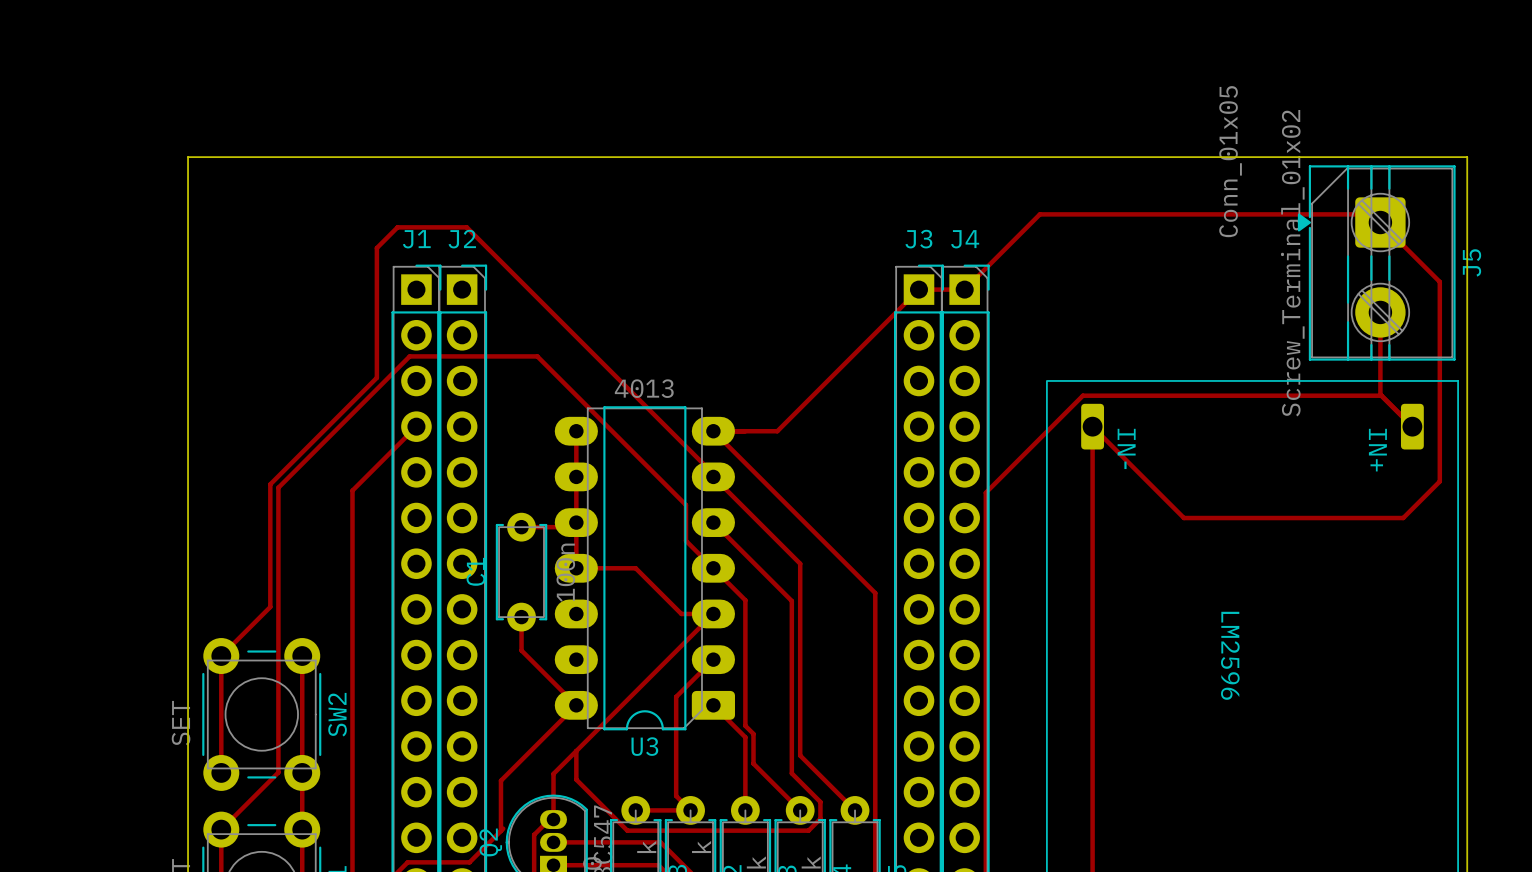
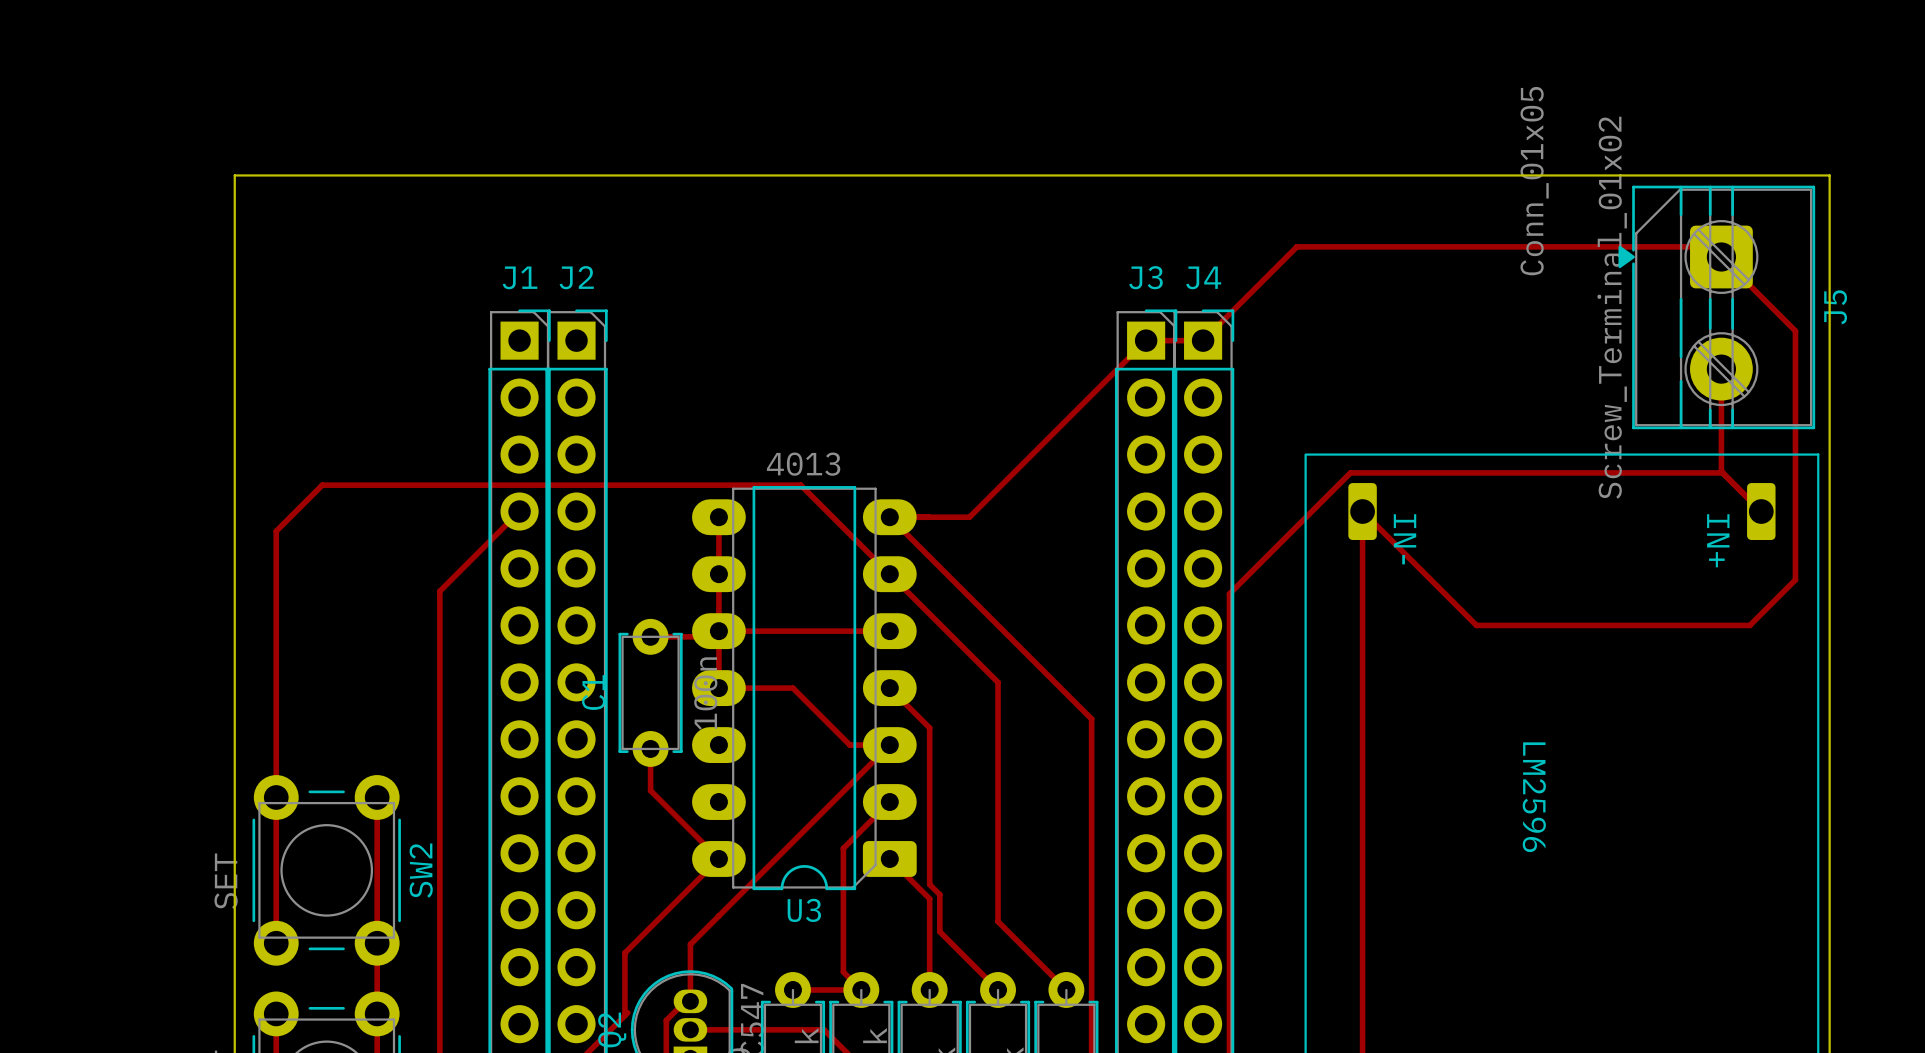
top track: (713, 476) (713, 473) (466, 227) (397, 227) (376, 248) (376, 377) (270, 484) (270, 607) (221, 656) -> (889, 574) (800, 485) (322, 485) (276, 531) (276, 797)
top track: (713, 522) (791, 601) (791, 773) (820, 802) (820, 818) (808, 830) (627, 830) (576, 779) (576, 751) -> (889, 631) (718, 631)
top track: (713, 568) (685, 540) (685, 505) (537, 356) (409, 356) (278, 487) (278, 772) (221, 829) -> none

